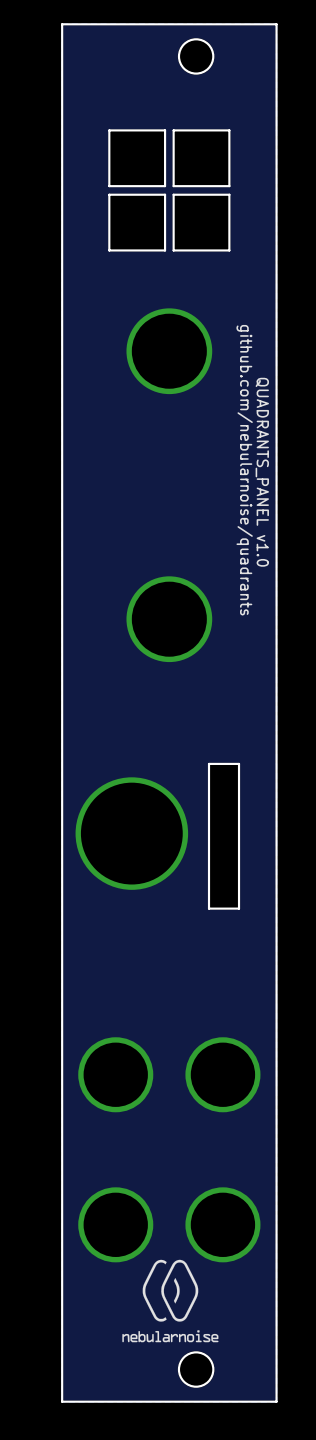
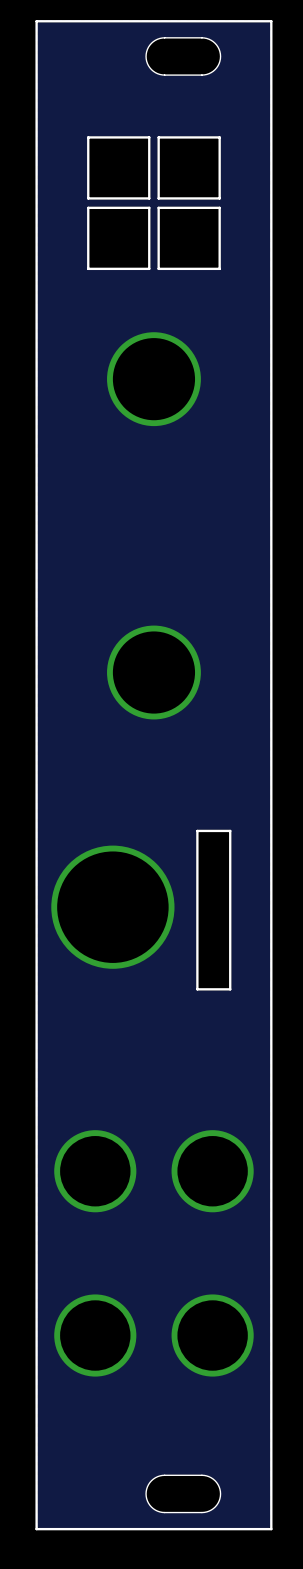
drawing: none -> [145, 37, 222, 76]
round board edge: [177, 38, 215, 75] -> none
text: github.com/nebularnoise/quadrants (244, 470) -> none
text: QUADRANTS_PANEL v1.0 (262, 472) -> none
drawing: [122, 1259, 219, 1343] -> none
drawing: none -> [145, 1474, 222, 1514]
round board edge: [177, 1351, 215, 1388] -> none

